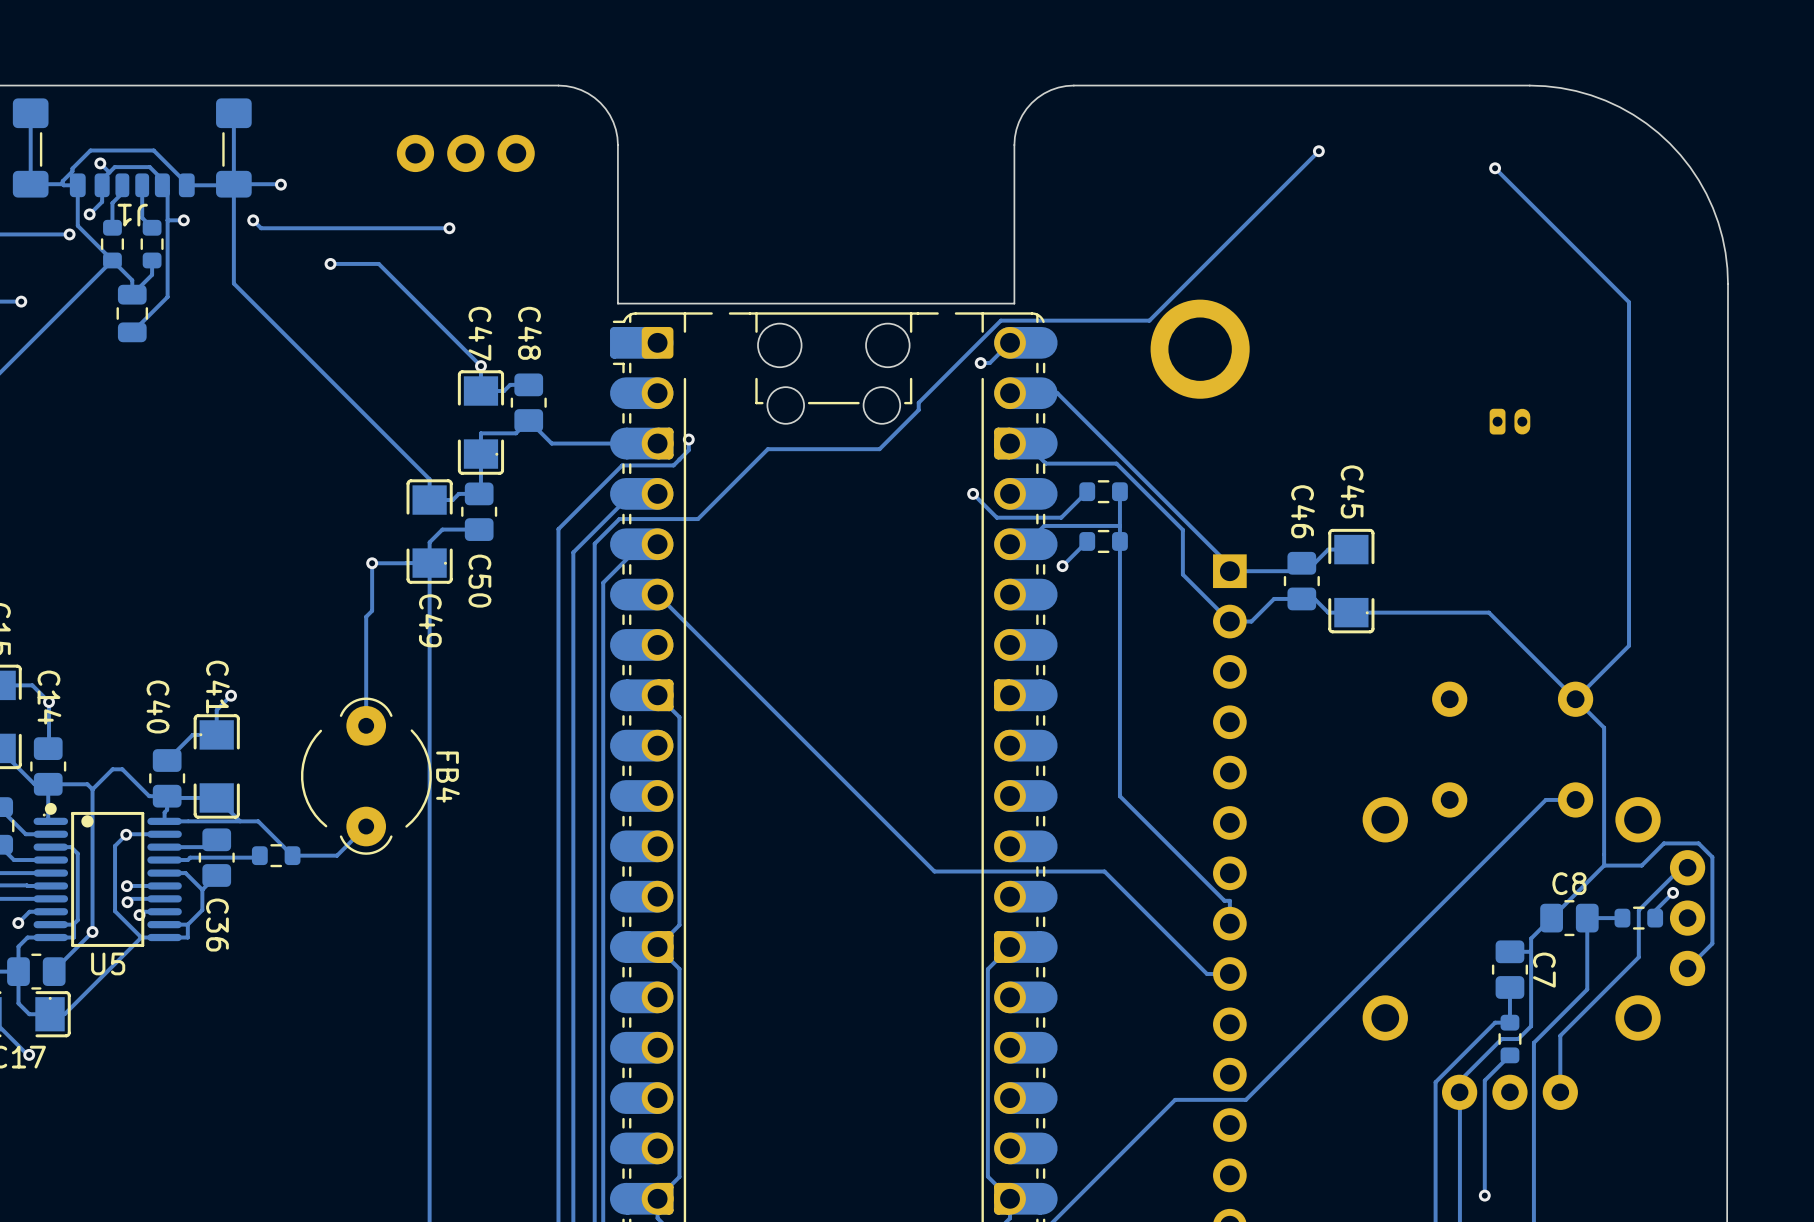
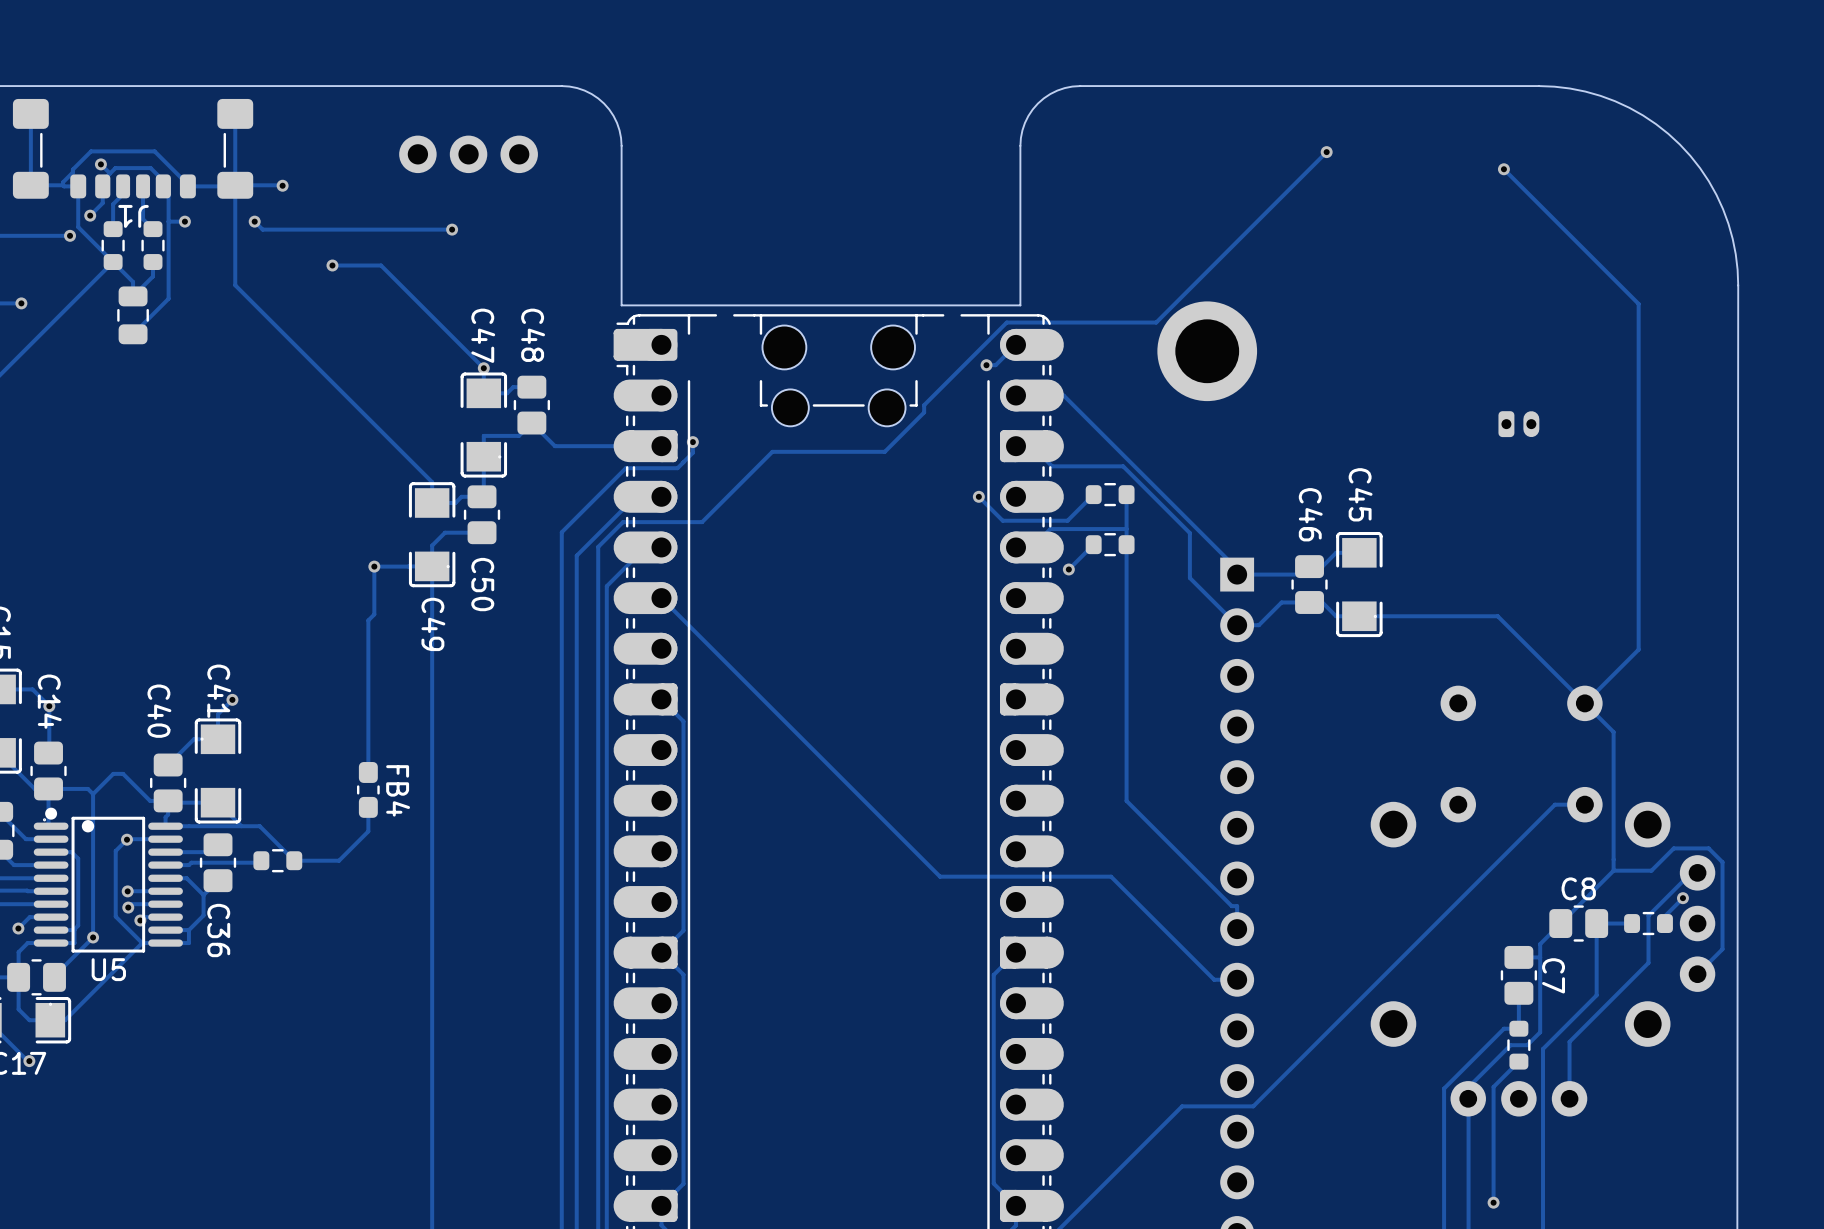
FB4 footprint: [301, 697, 432, 855] -> [356, 762, 380, 818]
track: none -> (368, 730) (368, 772)
FB4 name position: FB4 (447, 777) -> FB4 (398, 790)
track: none -> (368, 807) (368, 831)

